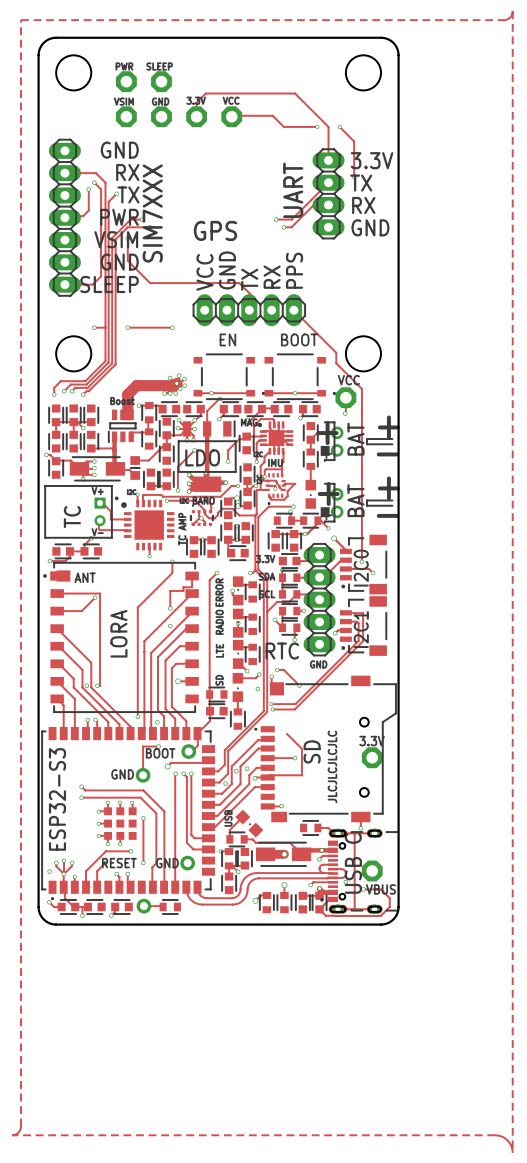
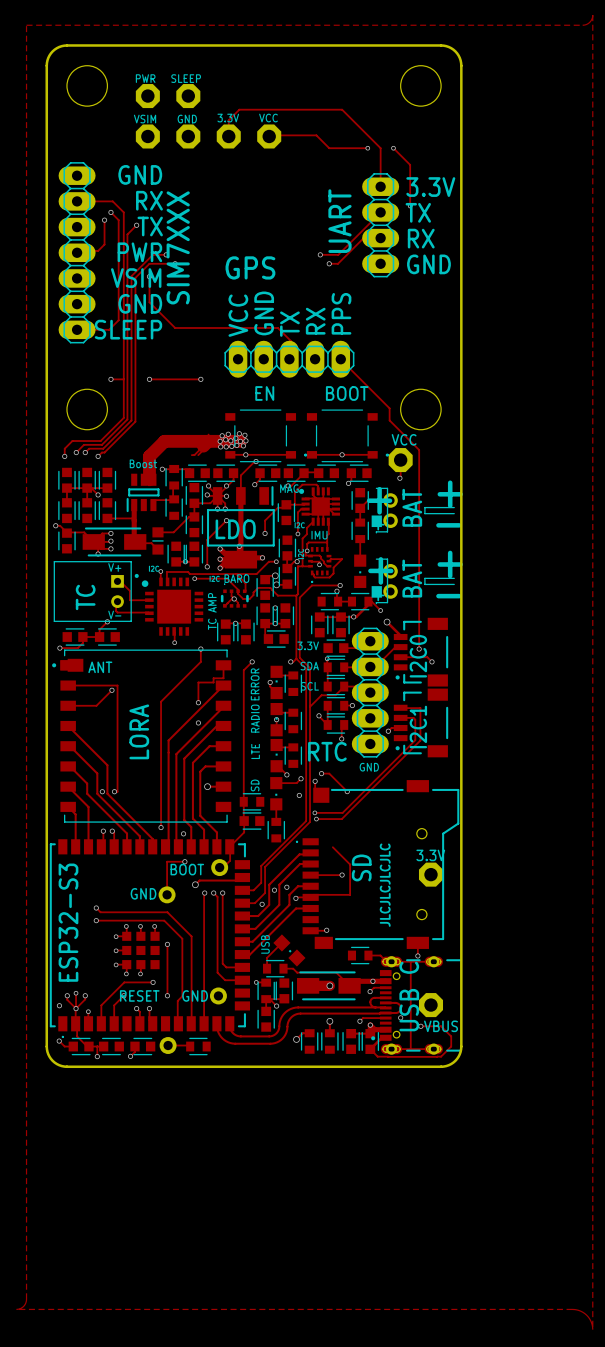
via: none -> (239, 433)
via: (179, 375) -> none
via: none -> (228, 434)
via: none -> (222, 435)
via: none -> (244, 435)
via: (170, 378) -> none
via: (184, 378) -> none
via: none -> (235, 438)
via: none -> (225, 439)
via: none -> (220, 441)
via: none -> (230, 440)
via: none -> (240, 441)
via: none -> (245, 440)
via: (176, 383) -> none
track: (136, 385) (174, 385) (175, 393) -> (159, 446) (164, 441) (240, 441)
via: (184, 385) -> none
via: none -> (231, 446)
via: none -> (236, 445)
via: none -> (243, 445)
via: none -> (220, 446)
via: none -> (226, 446)
via: (180, 389) -> none
via: (164, 393) -> none
via: (170, 393) -> none
via: (175, 393) -> none

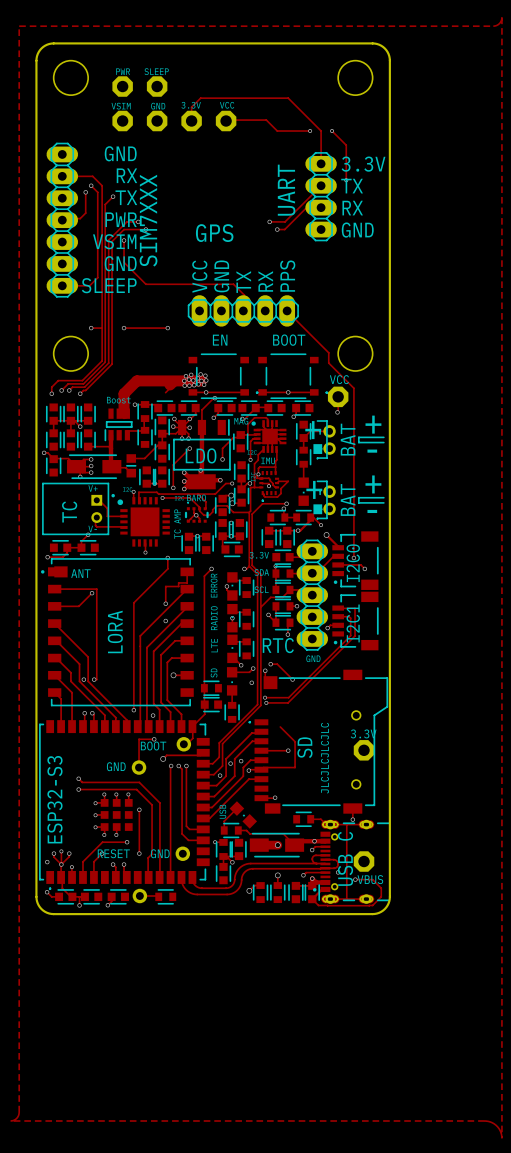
track: (208, 434) (208, 441) (194, 455) (191, 455) -> none

